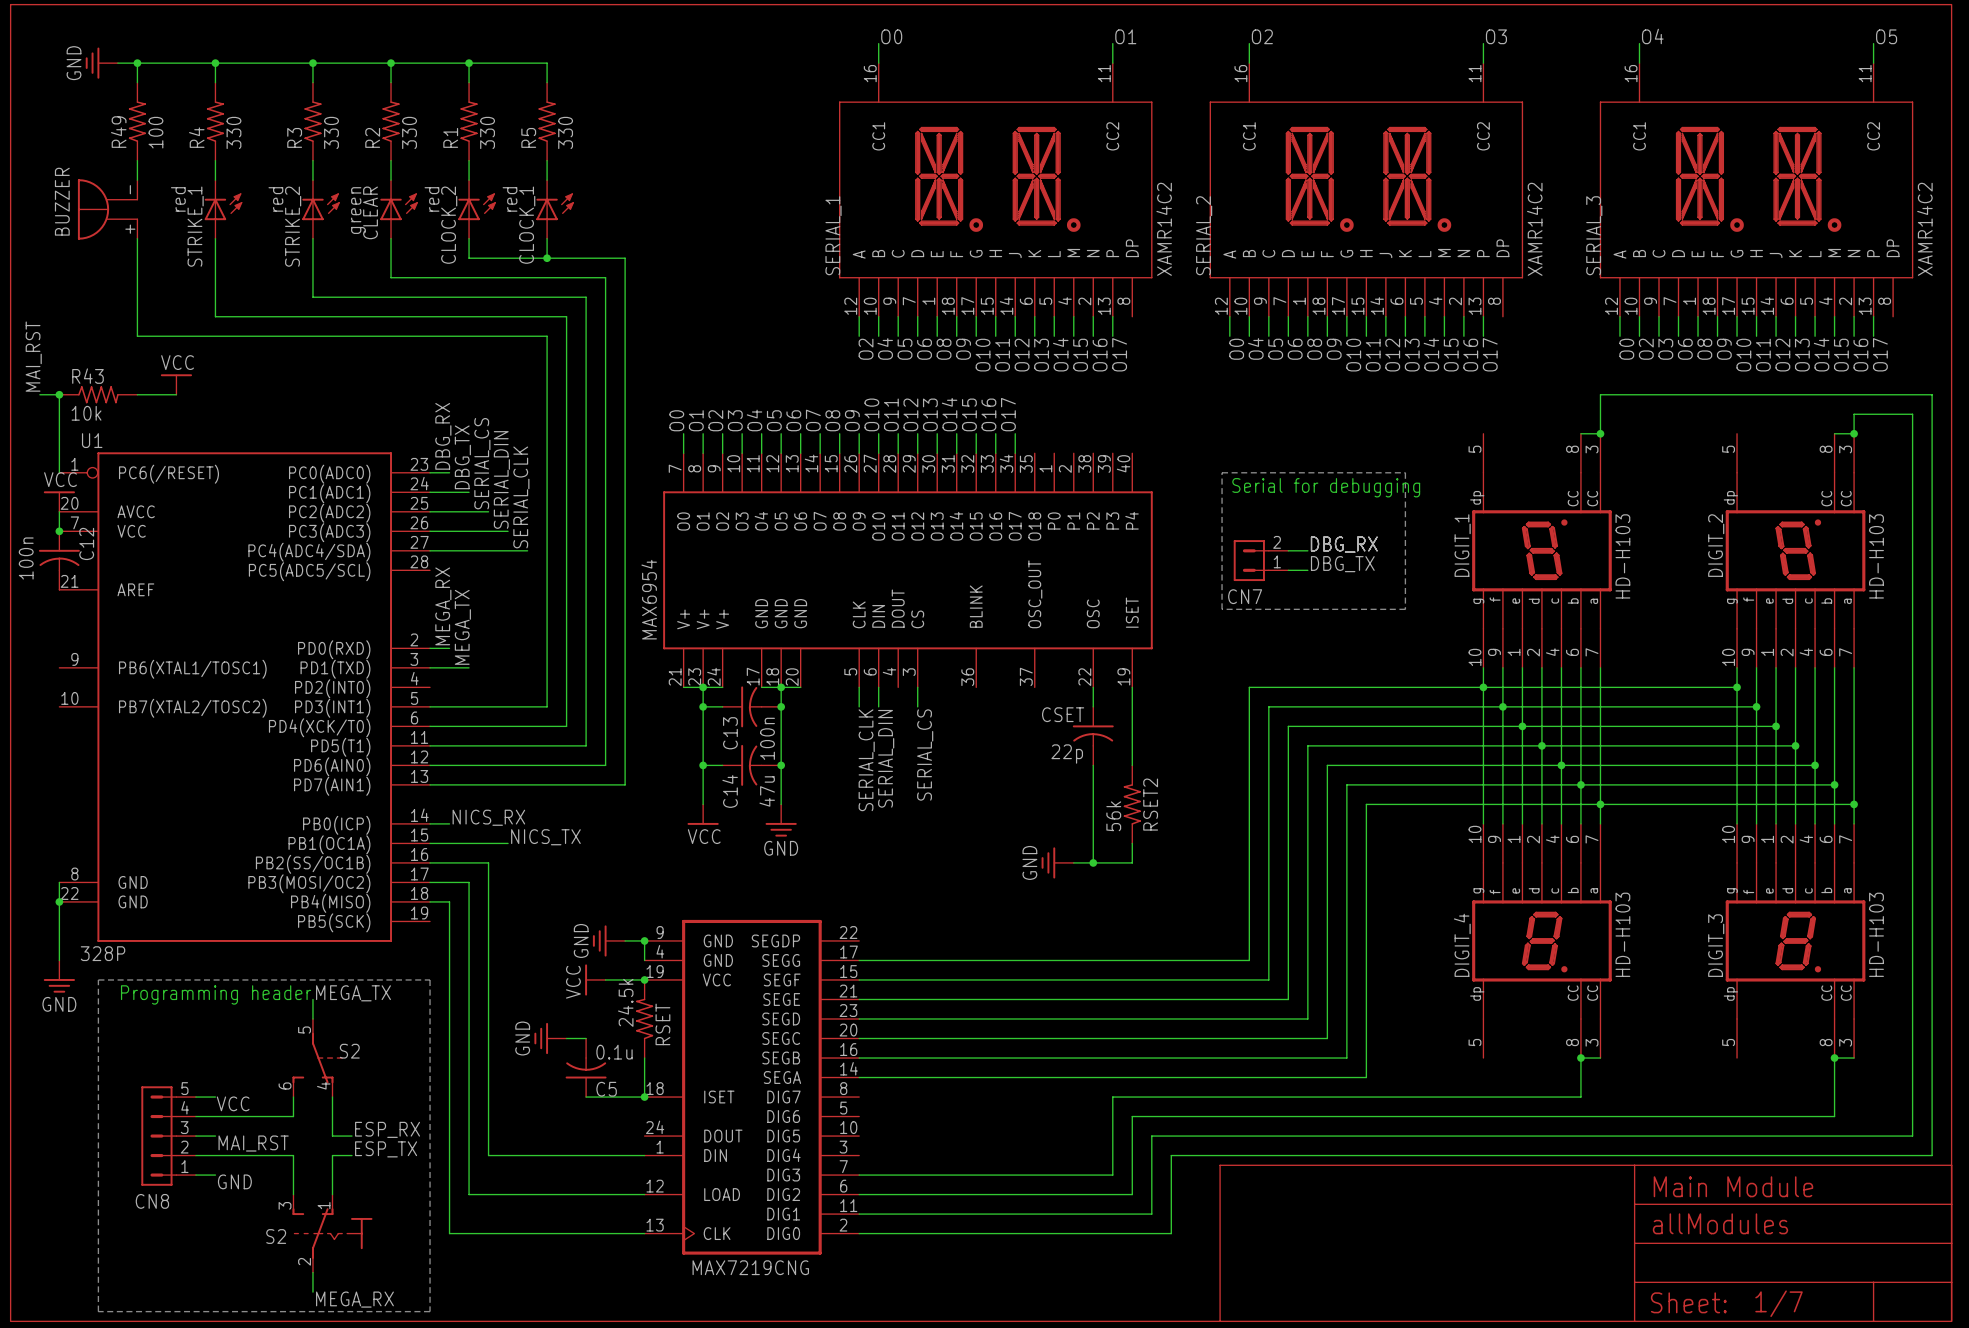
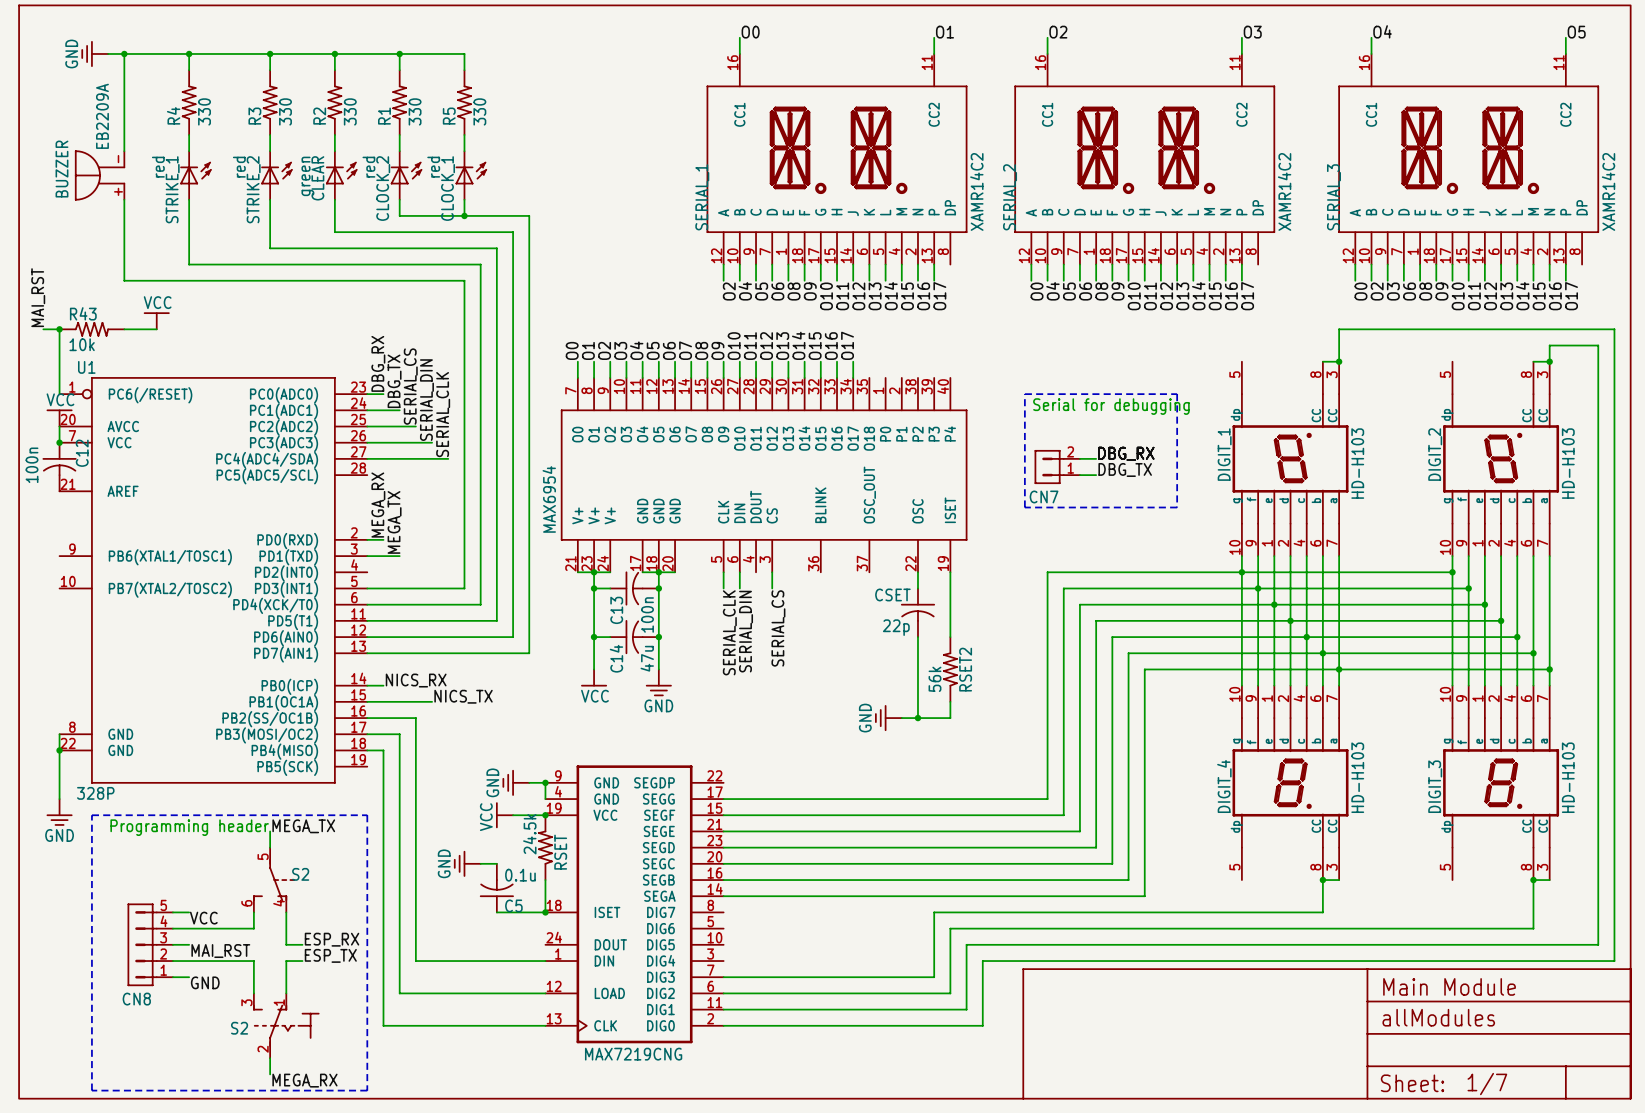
R49: 100 (137, 121) -> none
BUZZER value: none -> EB2209A (102, 116)

